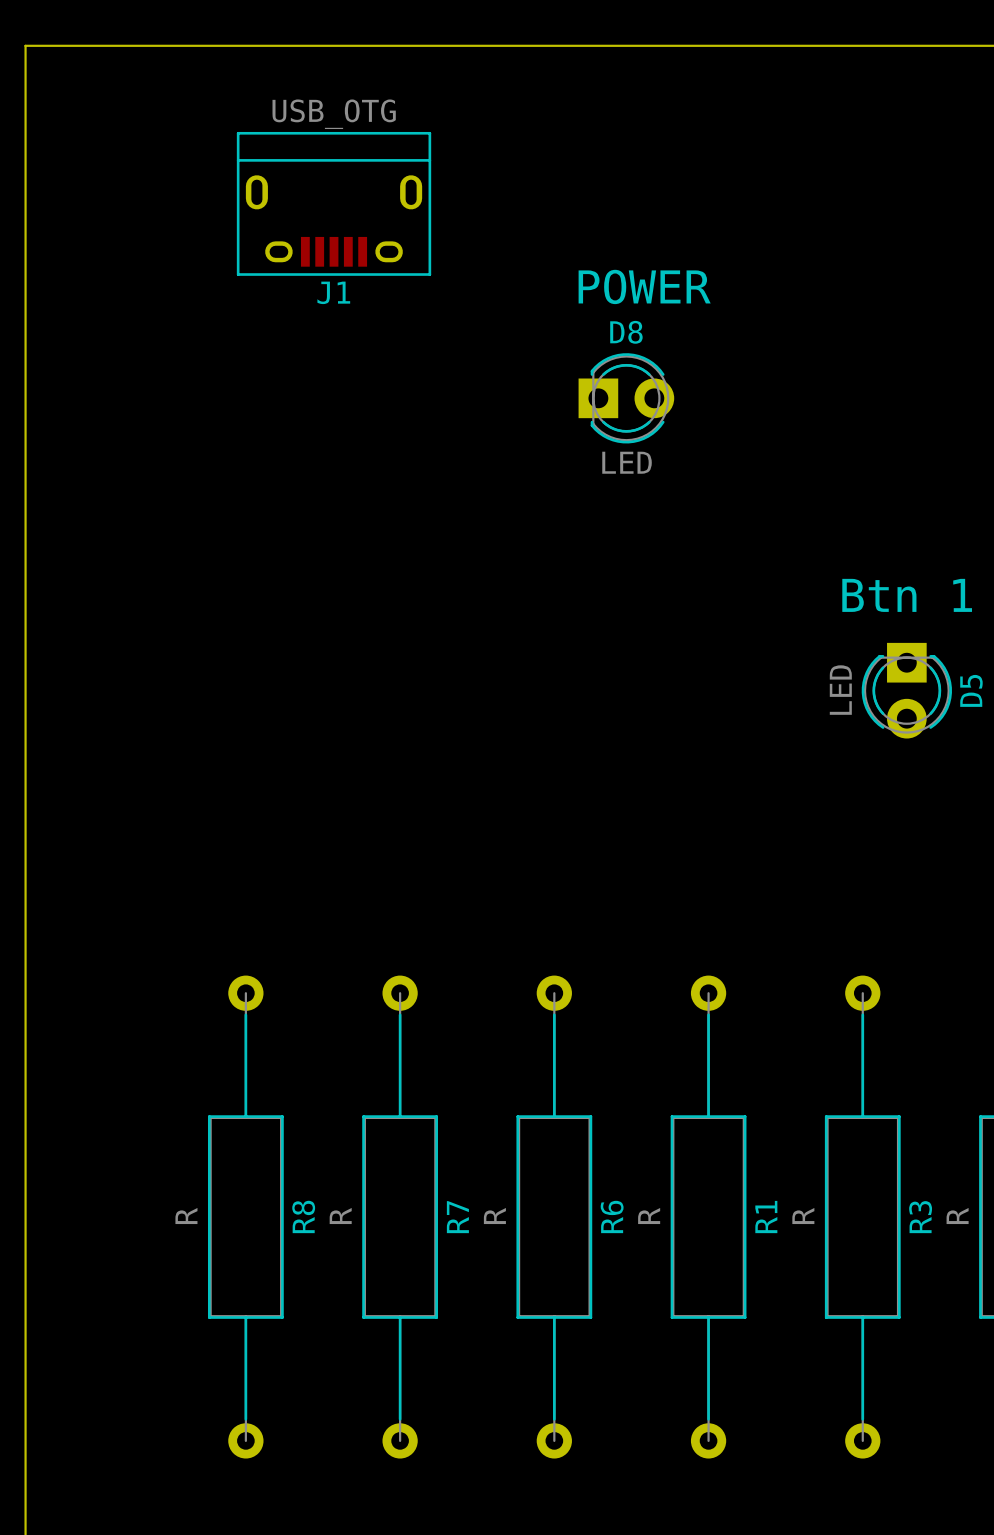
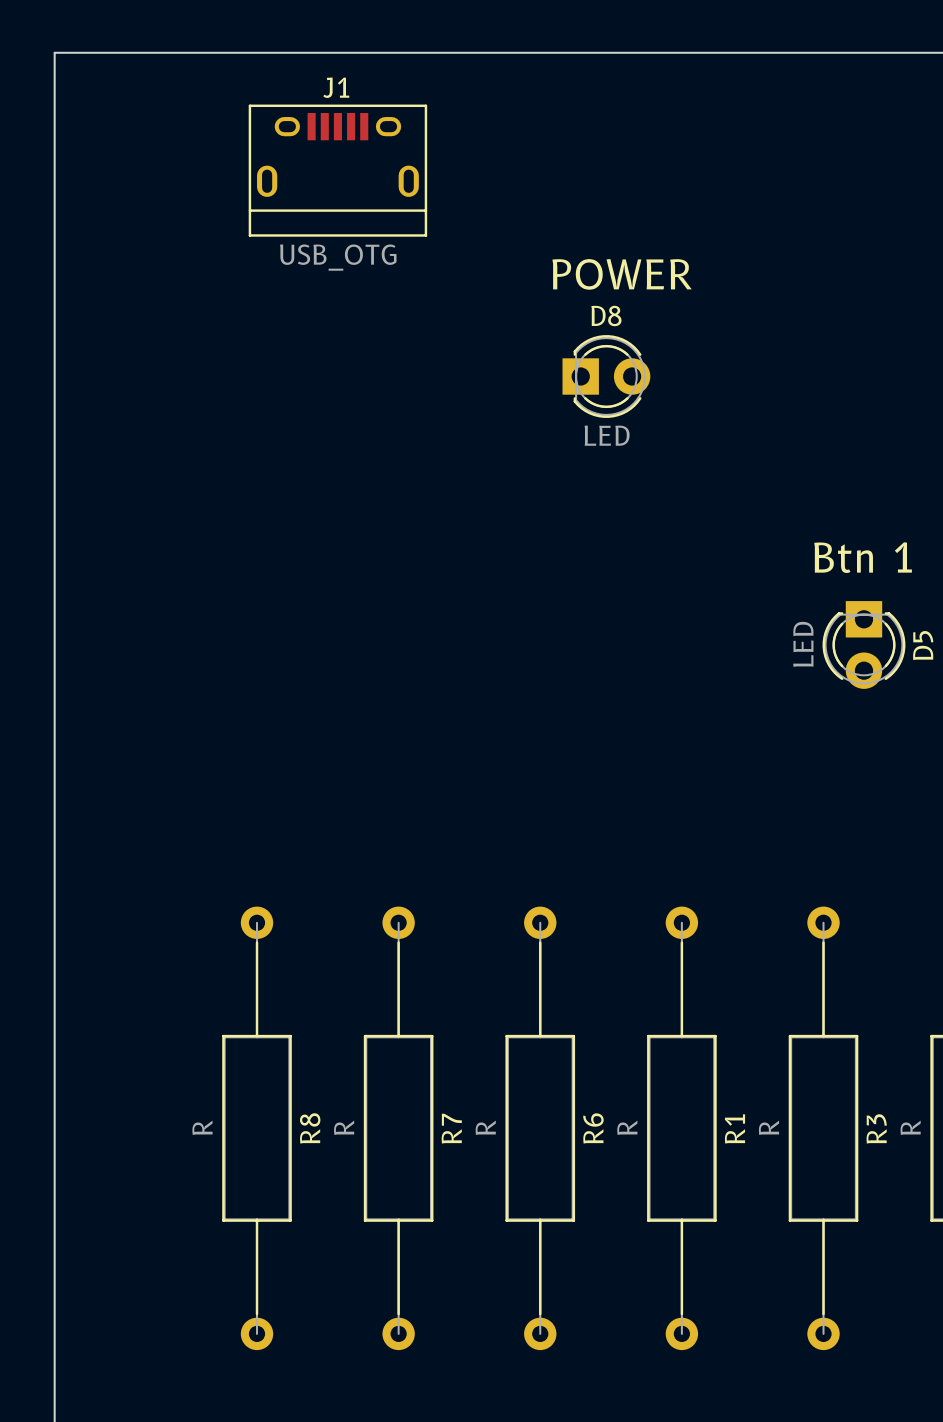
J1 rotation: 0° (334, 203) -> 180° (337, 170)

